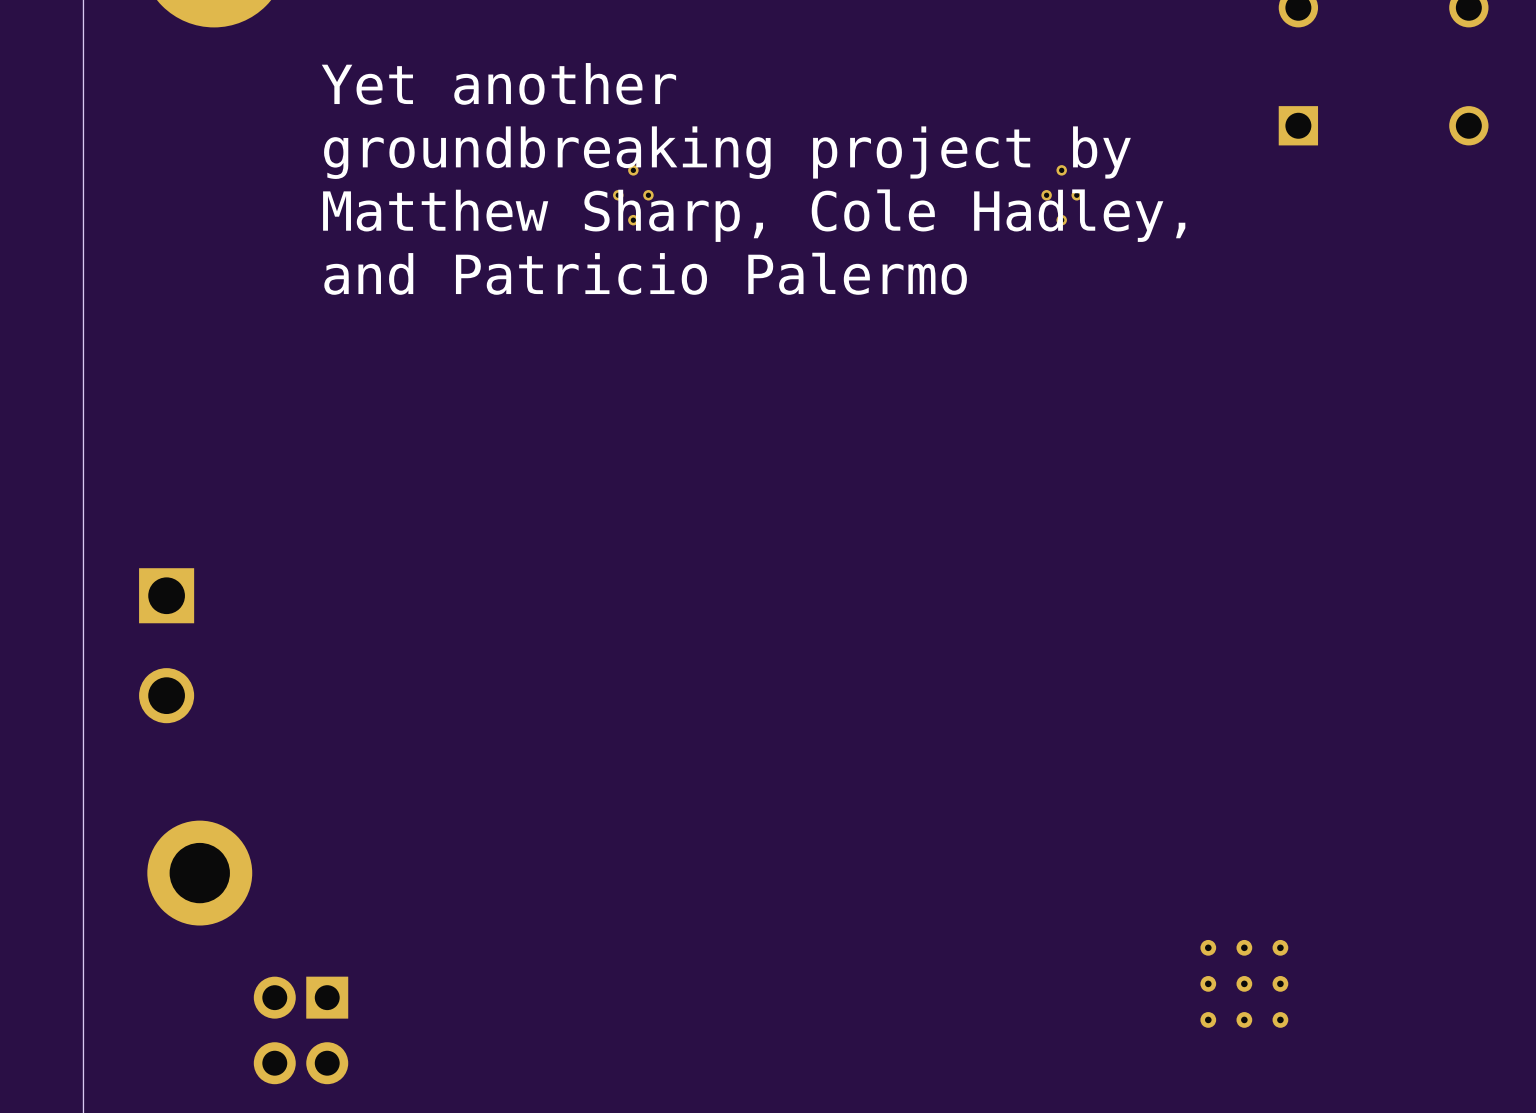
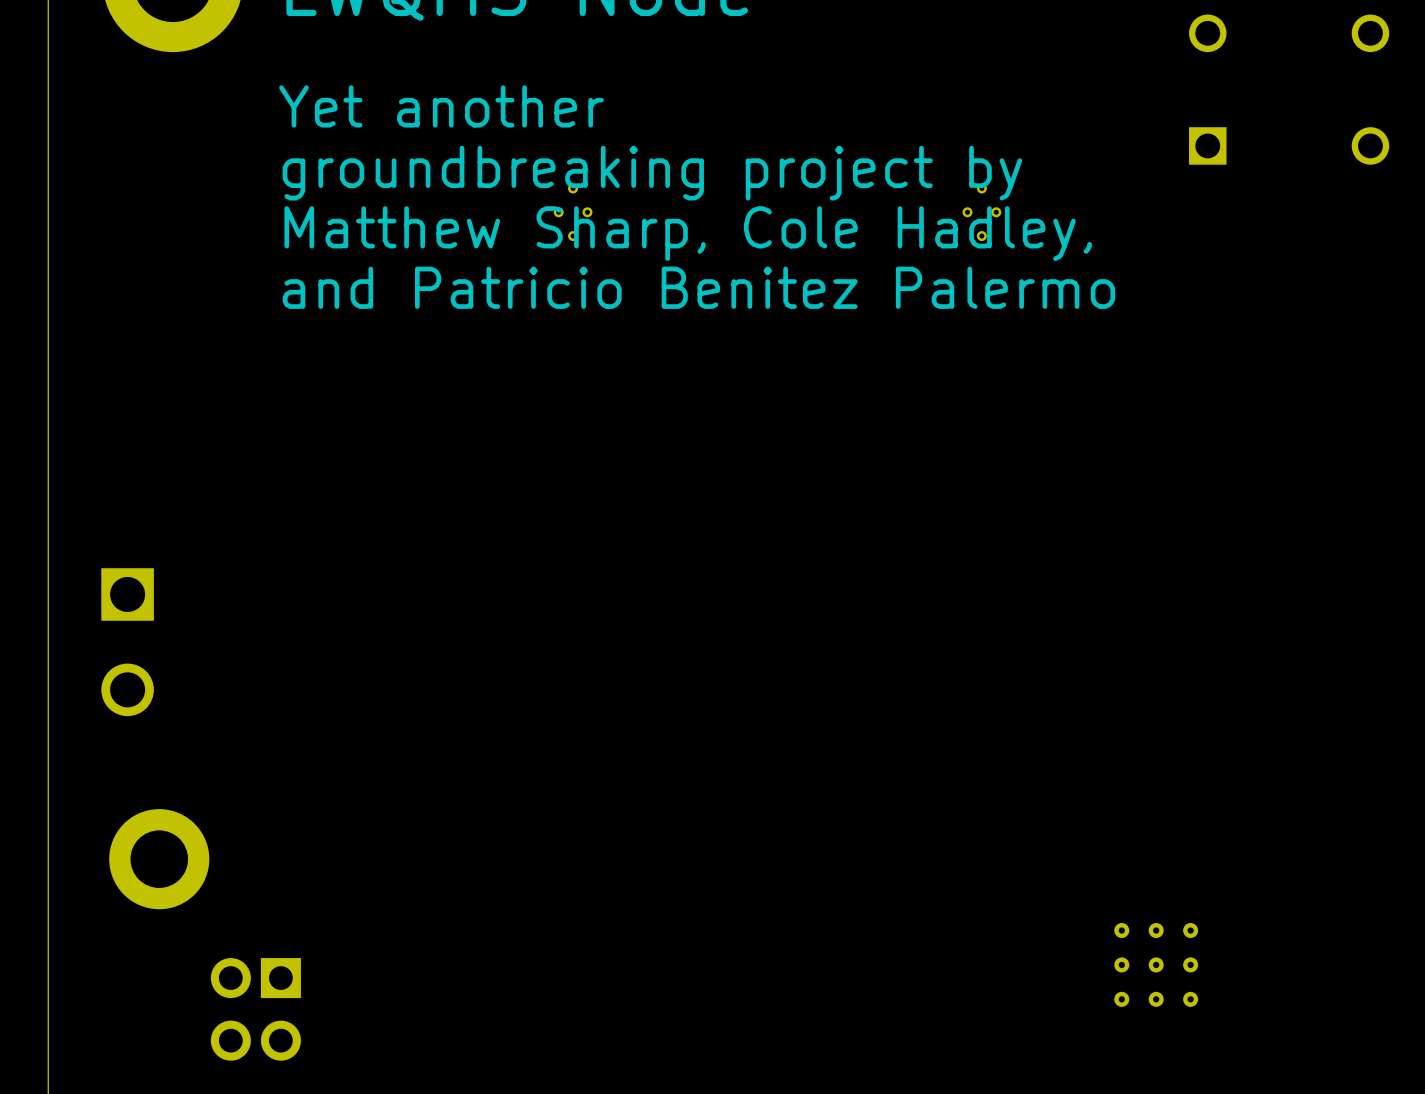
text: and Patricio Palermo (645, 273) -> and Patricio Benitez Palermo (698, 287)

